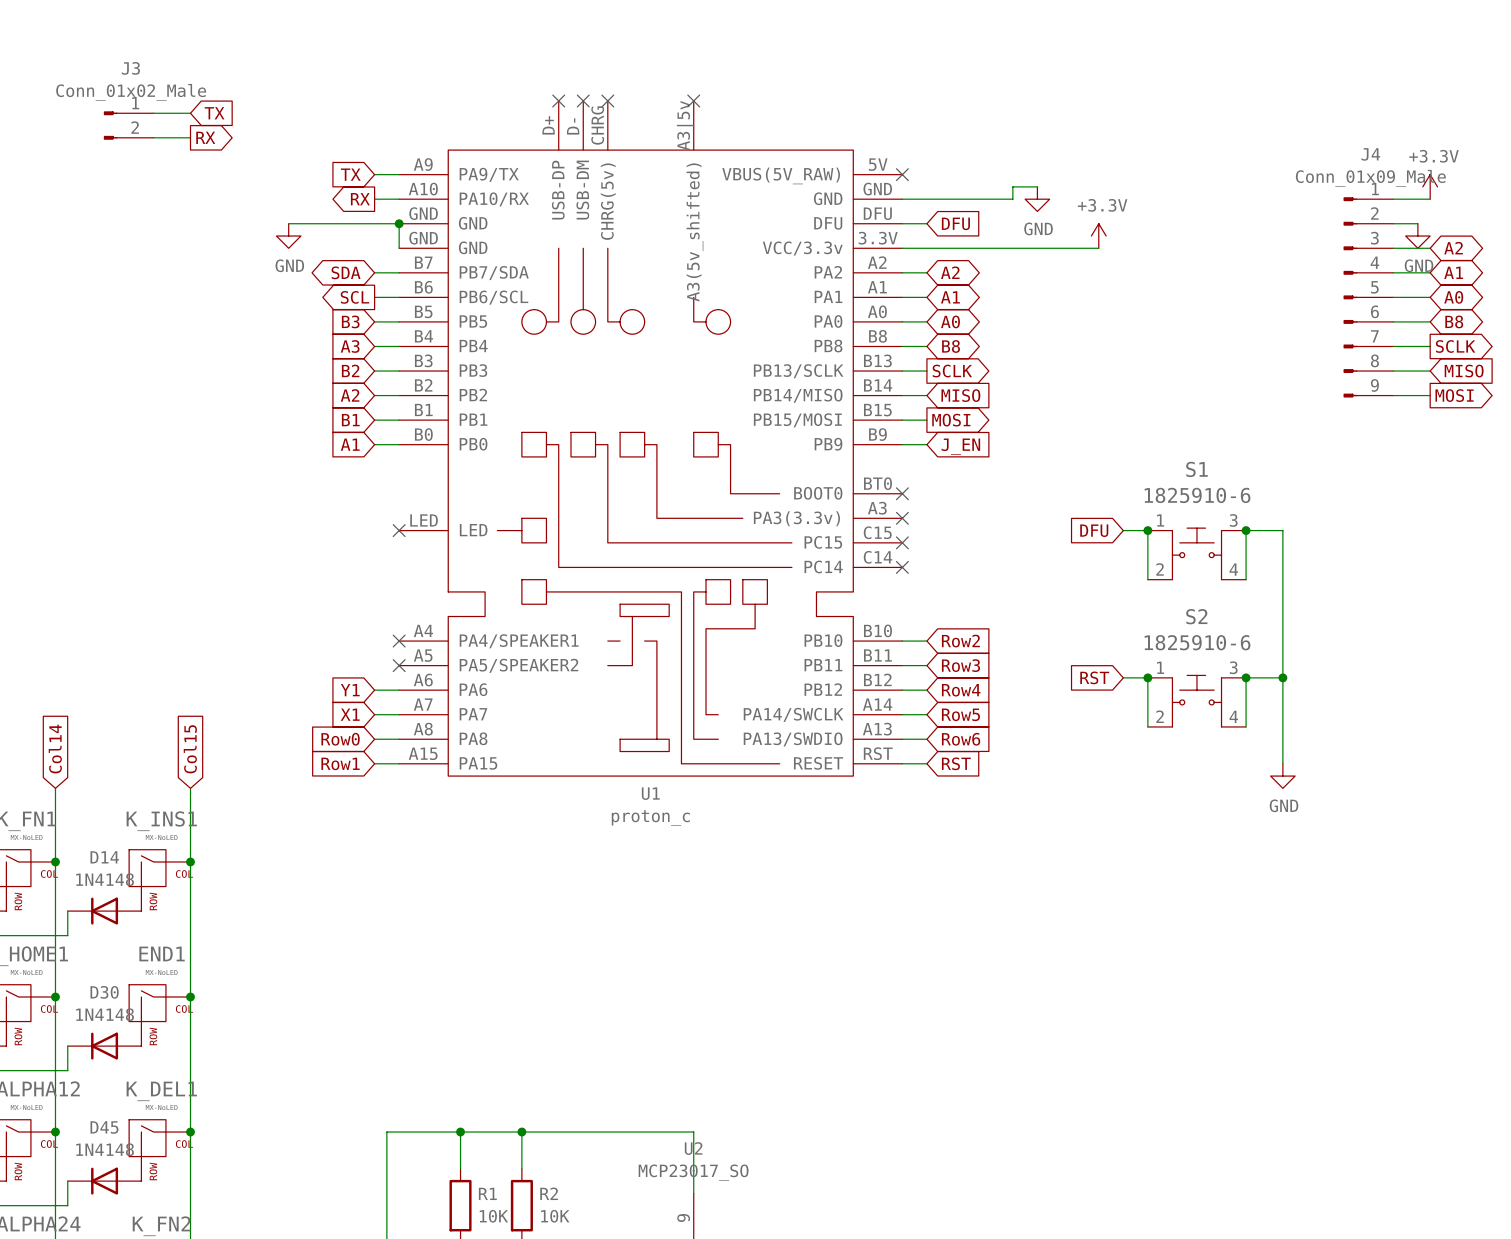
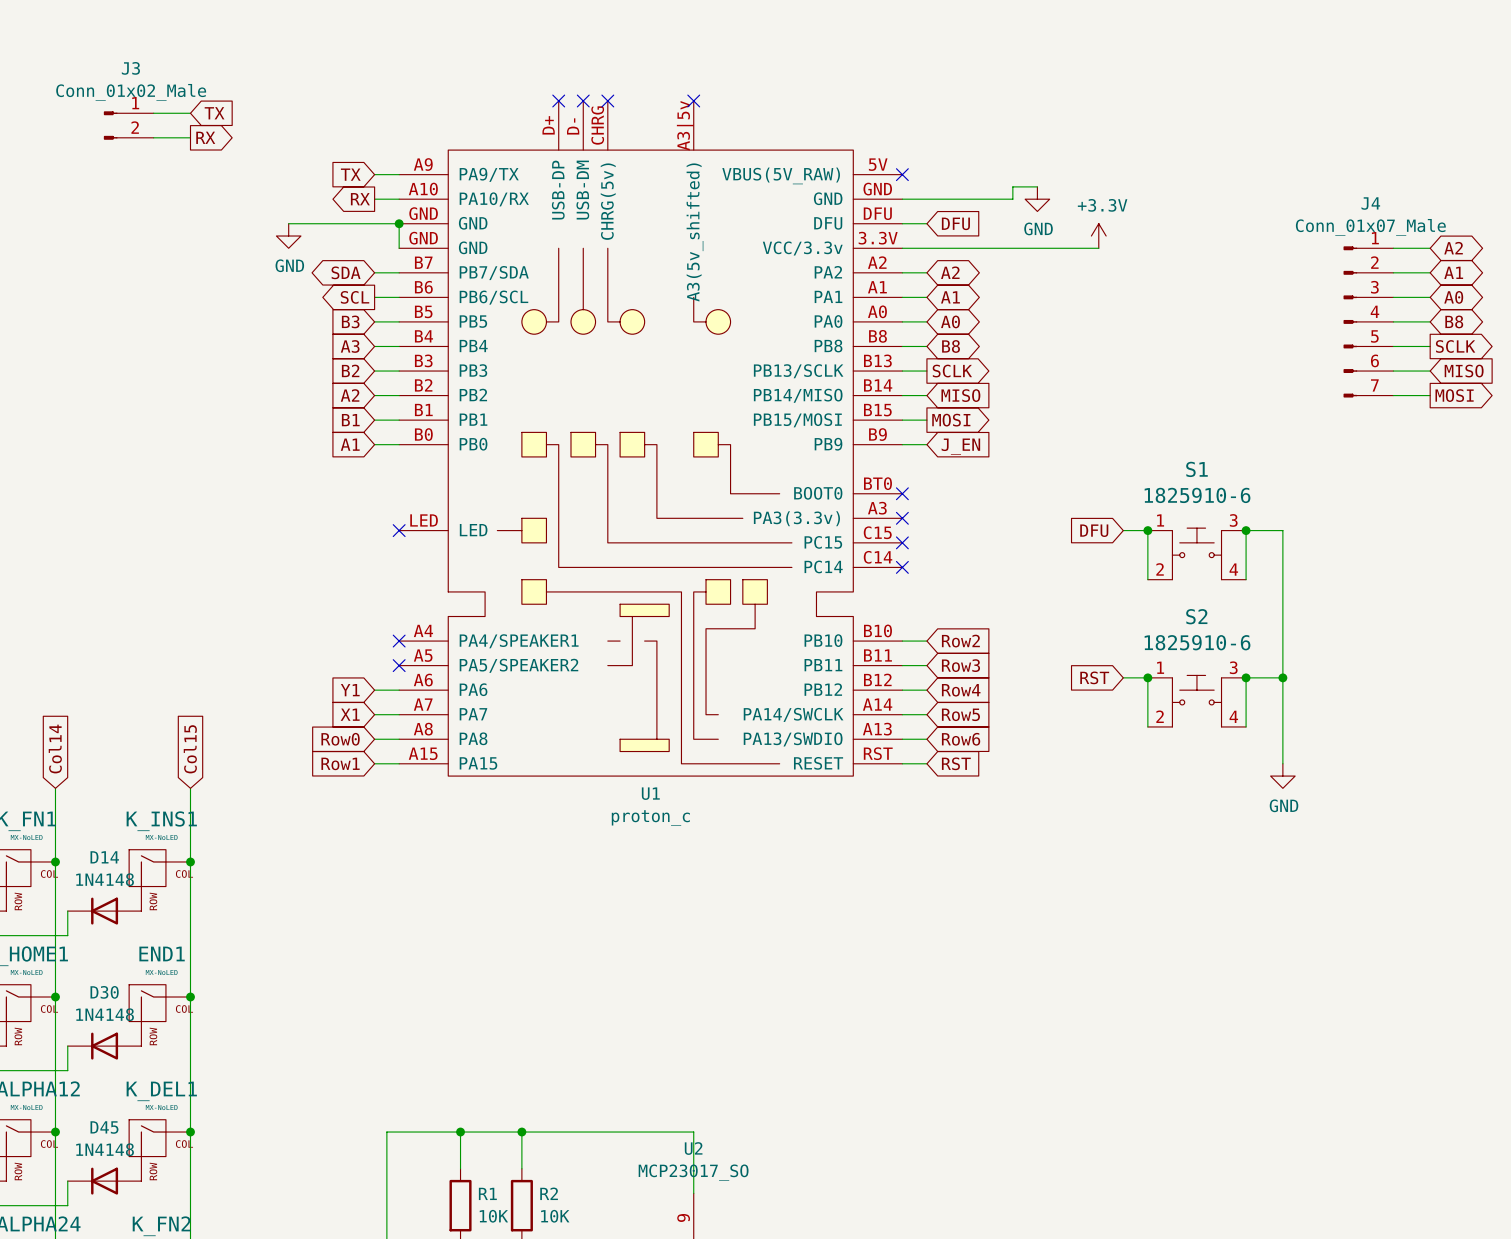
J4 name position: J4 (1370, 154) -> J4 (1370, 203)
J4 value: Conn_01x09_Male (1370, 178) -> Conn_01x07_Male (1370, 227)
power symbol: +3.3V (1430, 186) -> none
J4 symbol: [1343, 197, 1394, 398] -> [1343, 246, 1394, 398]
wire: (1393, 199) (1430, 199) -> none
wire: (1393, 223) (1417, 223) -> none
power symbol: GND (1417, 236) -> none

